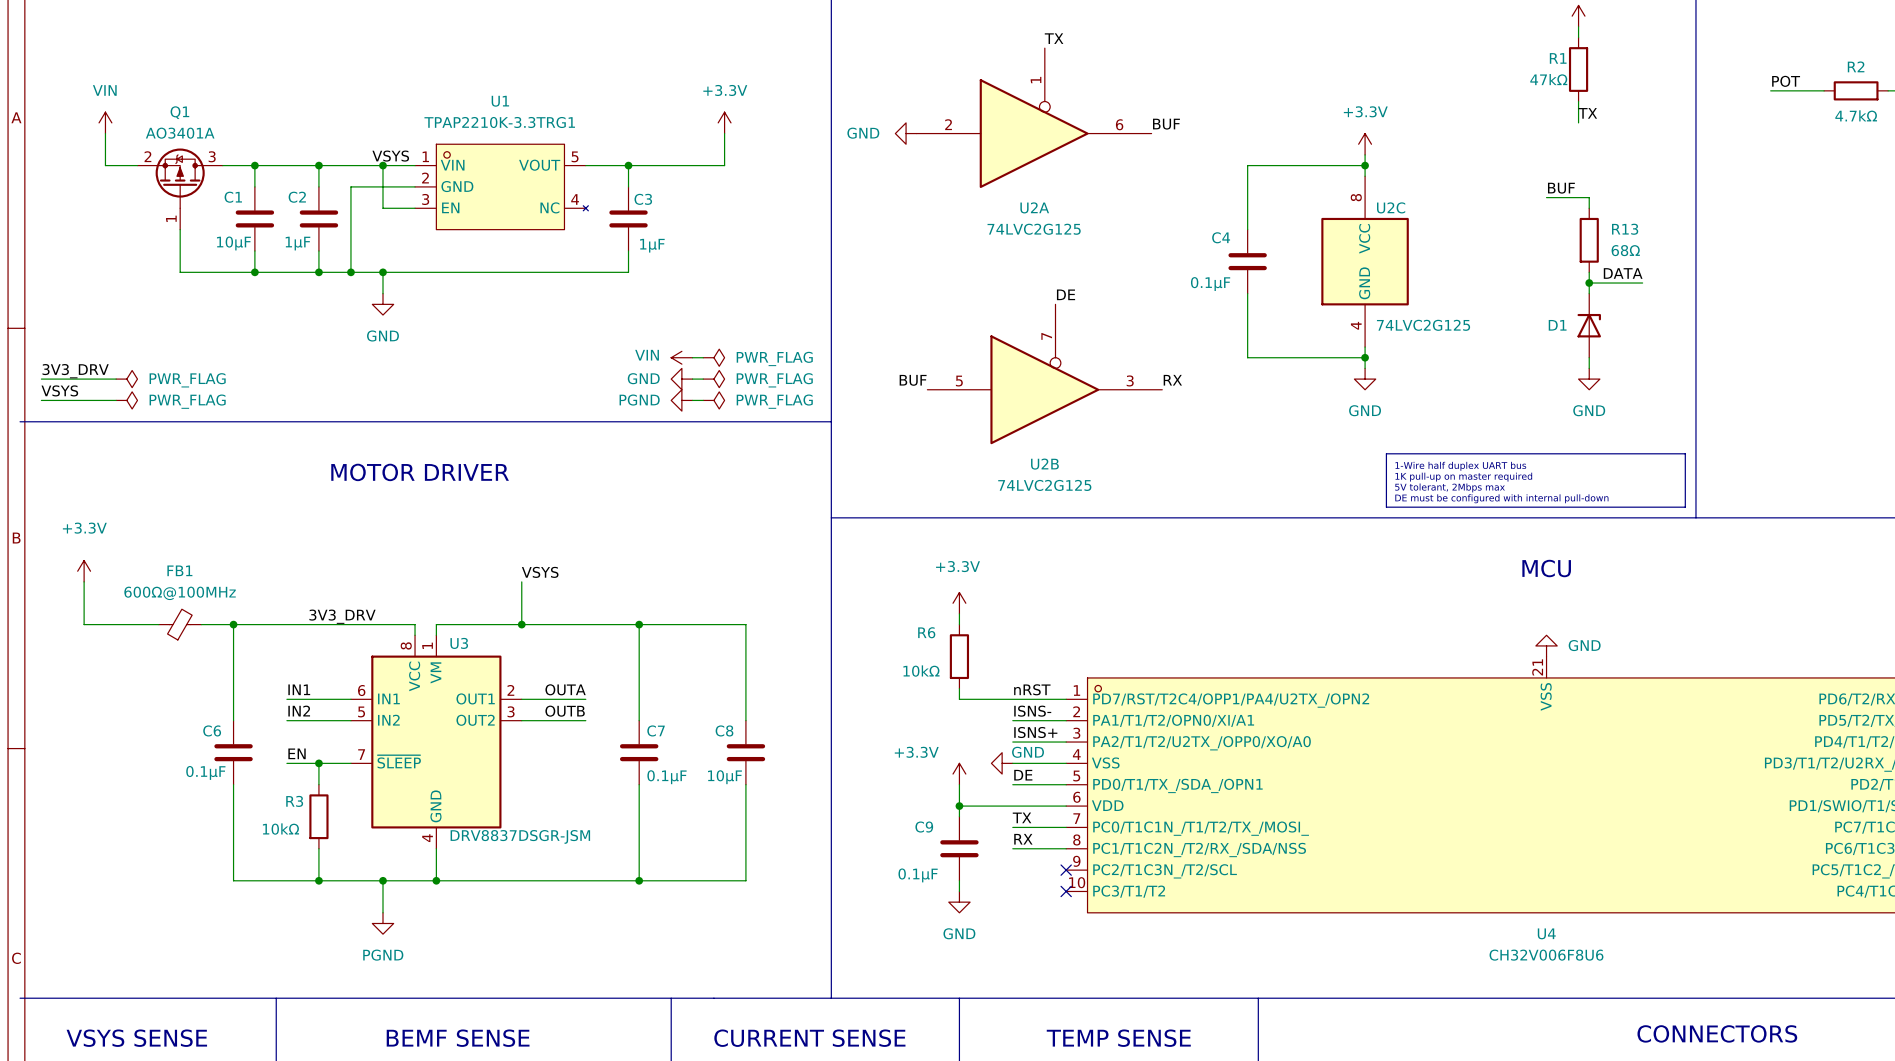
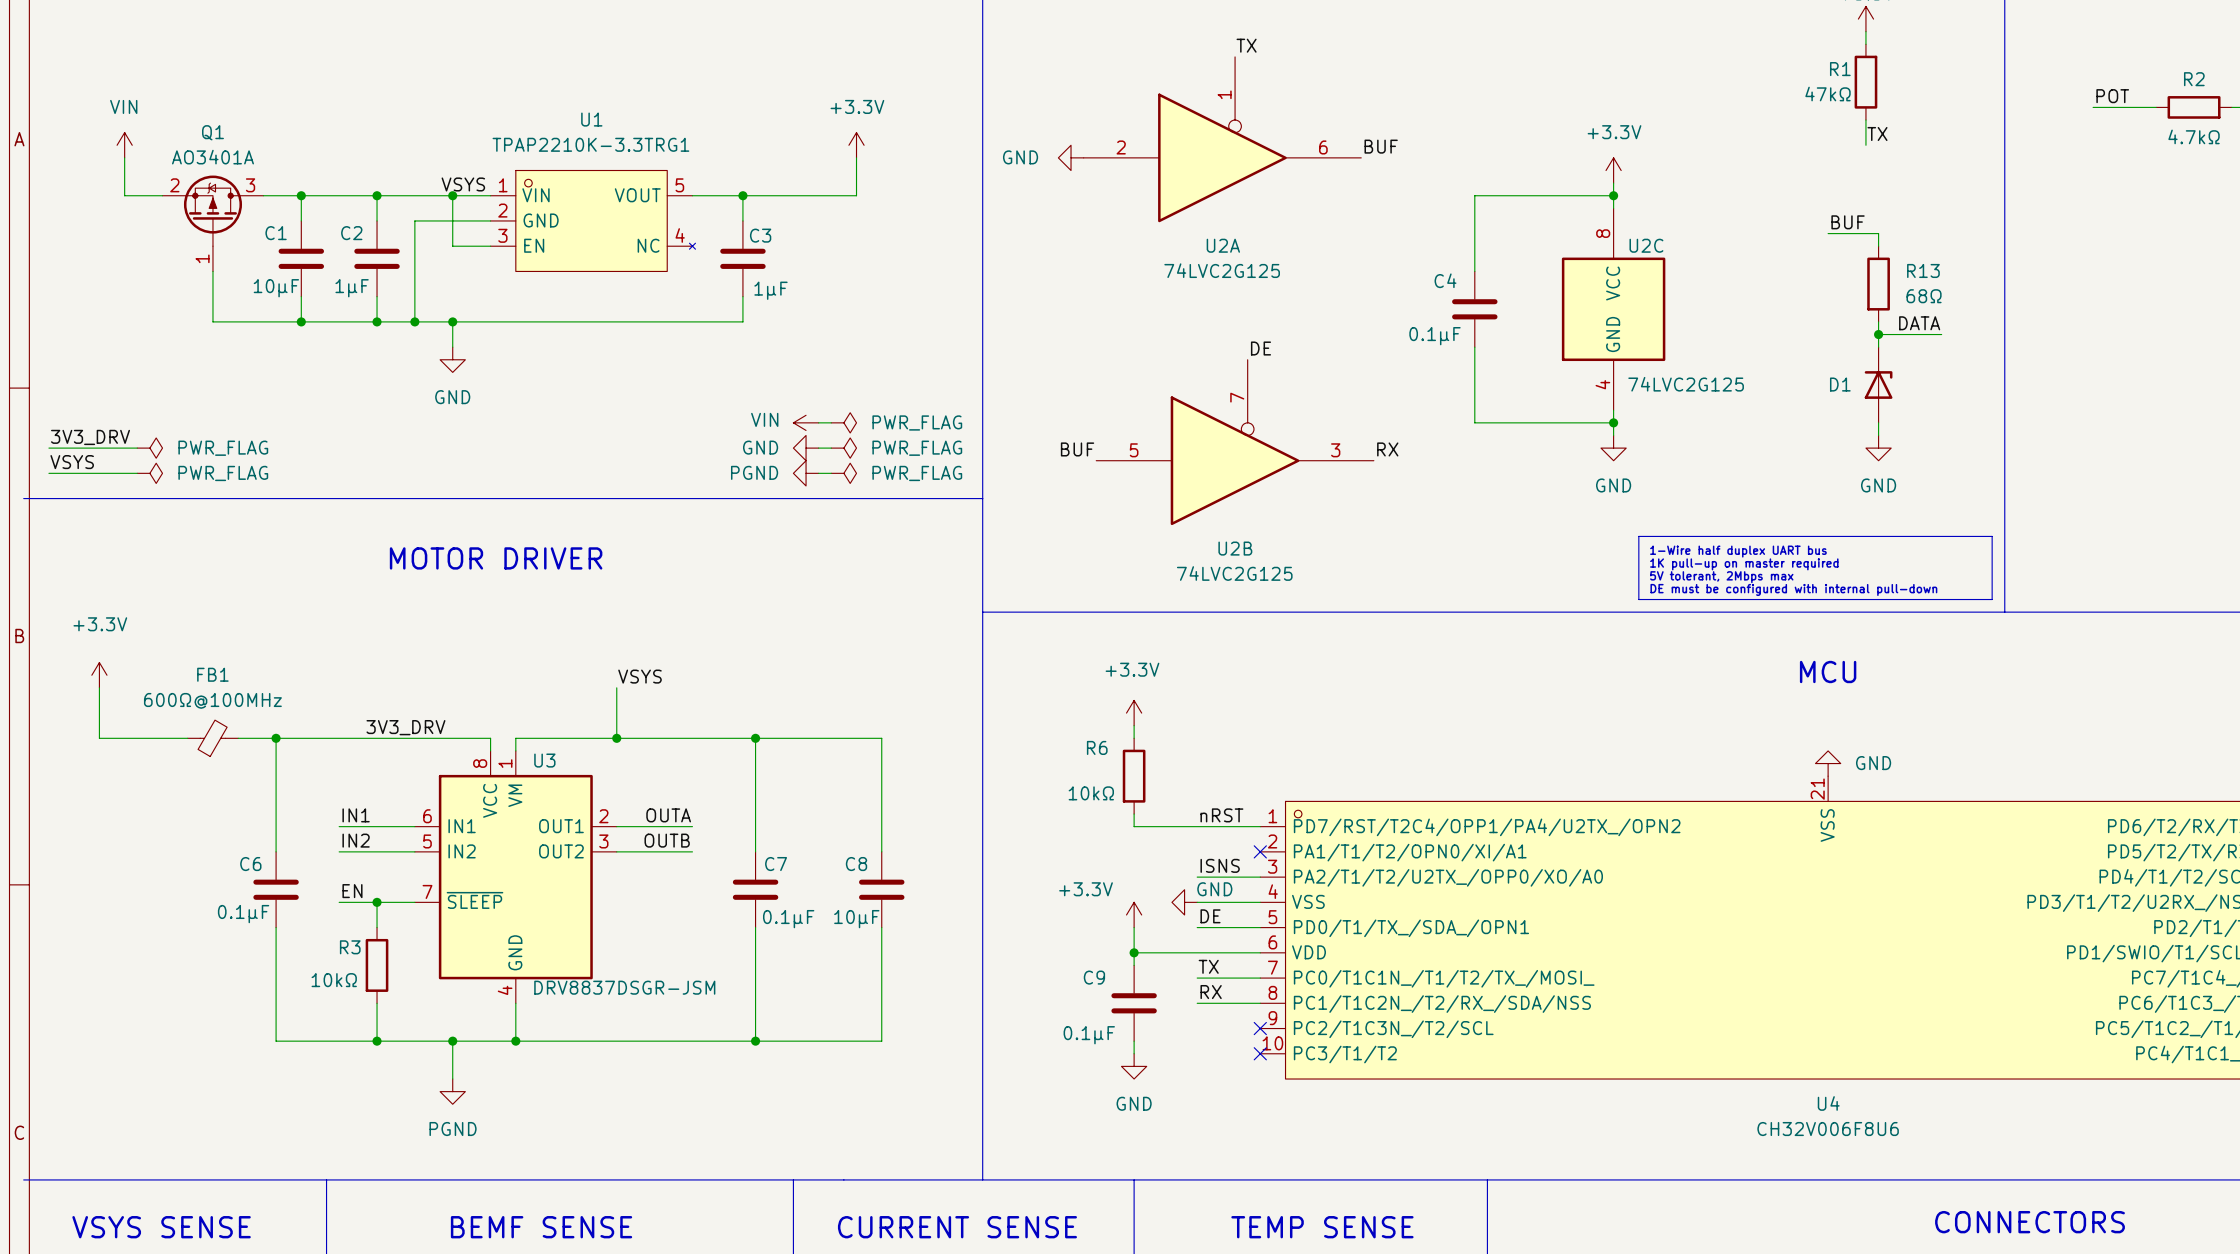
label: ISNS- (1032, 711) -> none
wire: (1012, 720) (1066, 720) -> none
no-connect mark: none -> (1260, 851)
label: ISNS+ (1035, 732) -> ISNS (1220, 865)

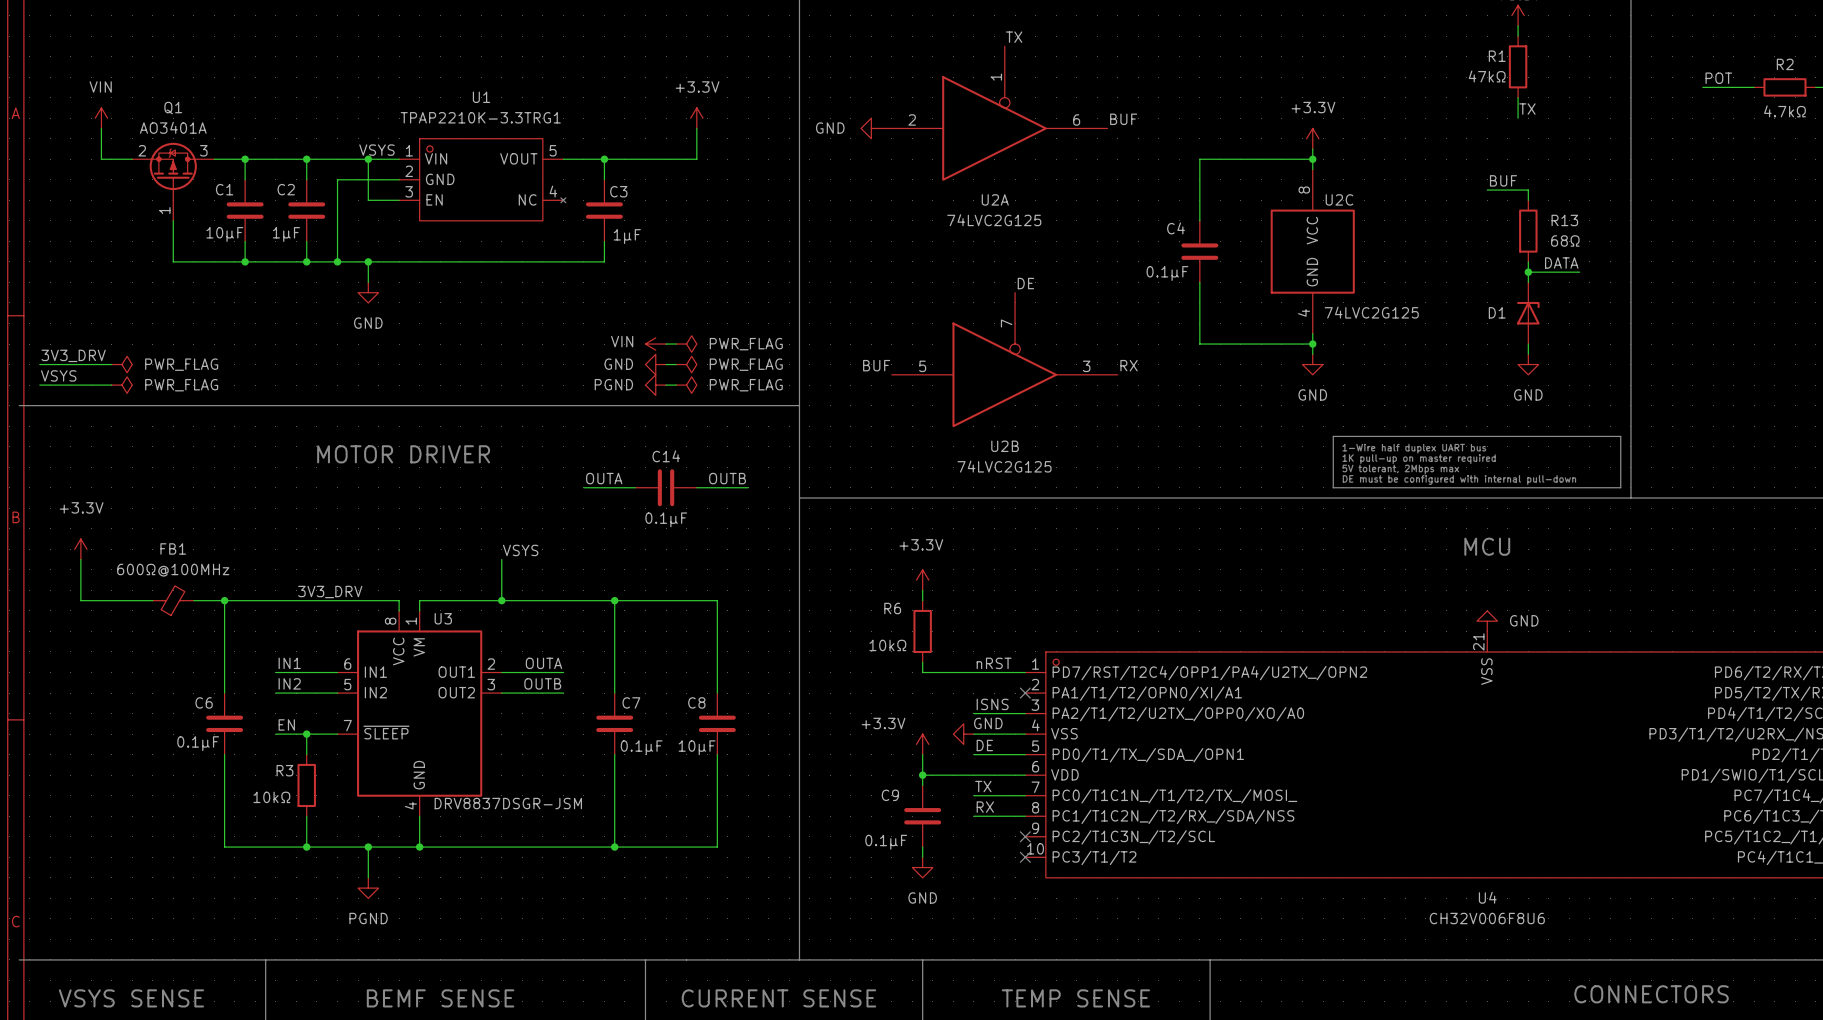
label: none -> OUTA (604, 478)
label: none -> OUTB (727, 478)
wire: none -> (583, 487) (635, 487)
C14: none -> 0.1µF (666, 487)
wire: none -> (696, 487) (748, 487)

